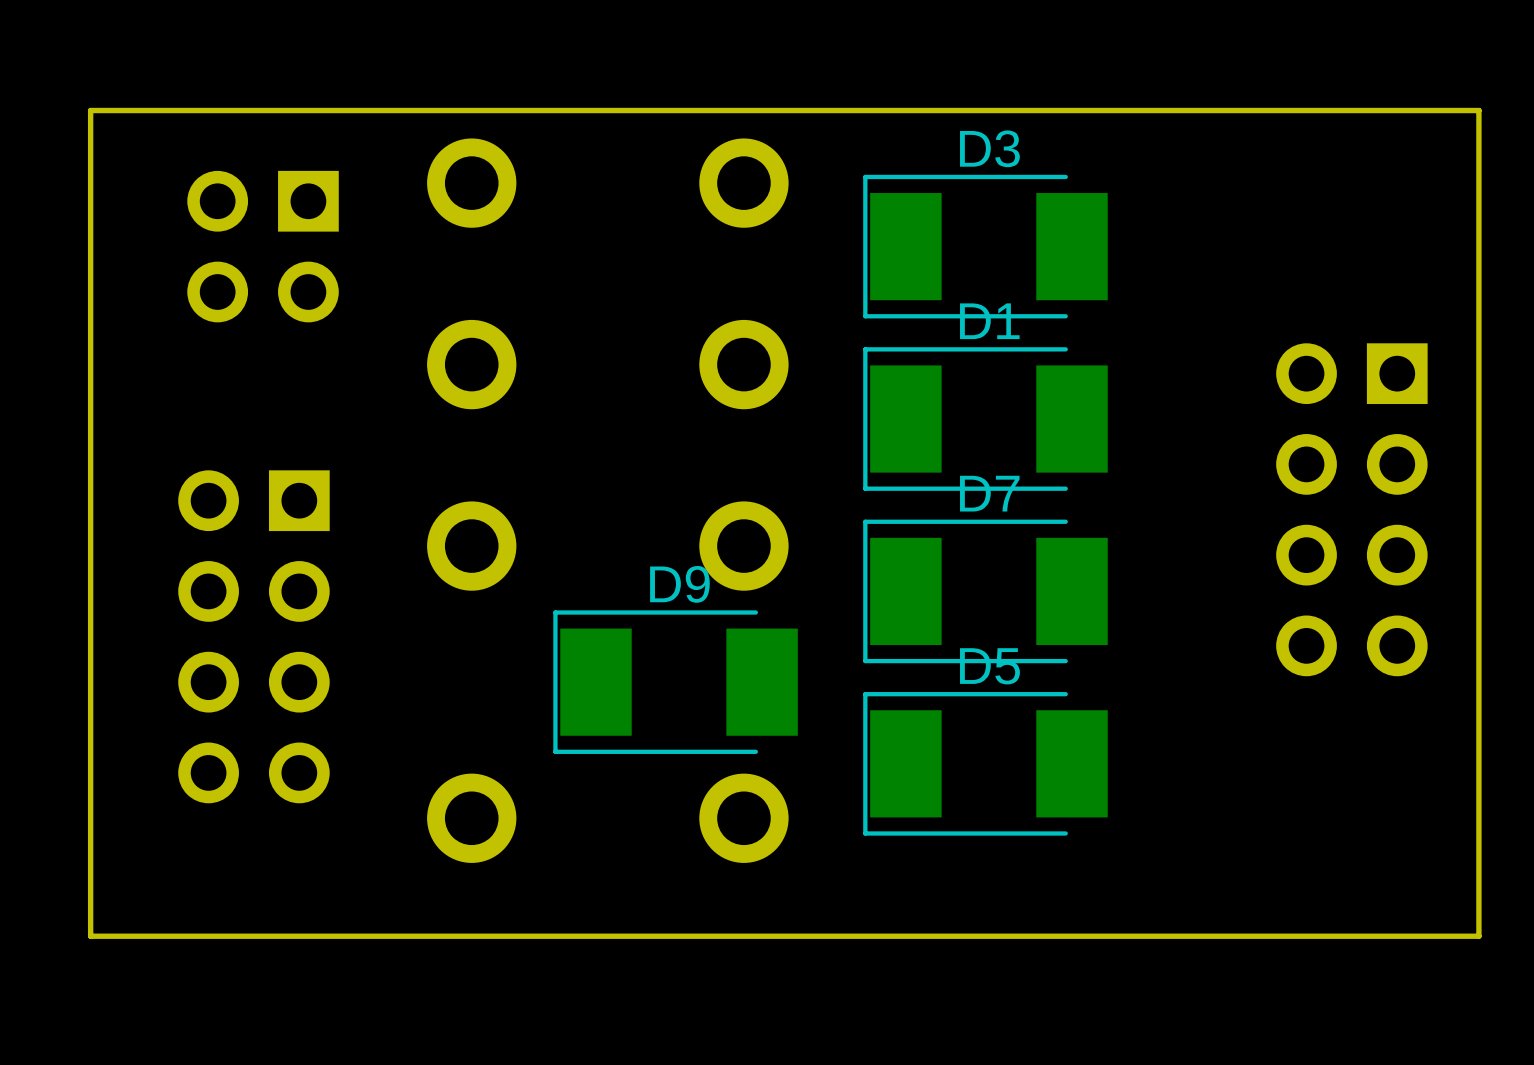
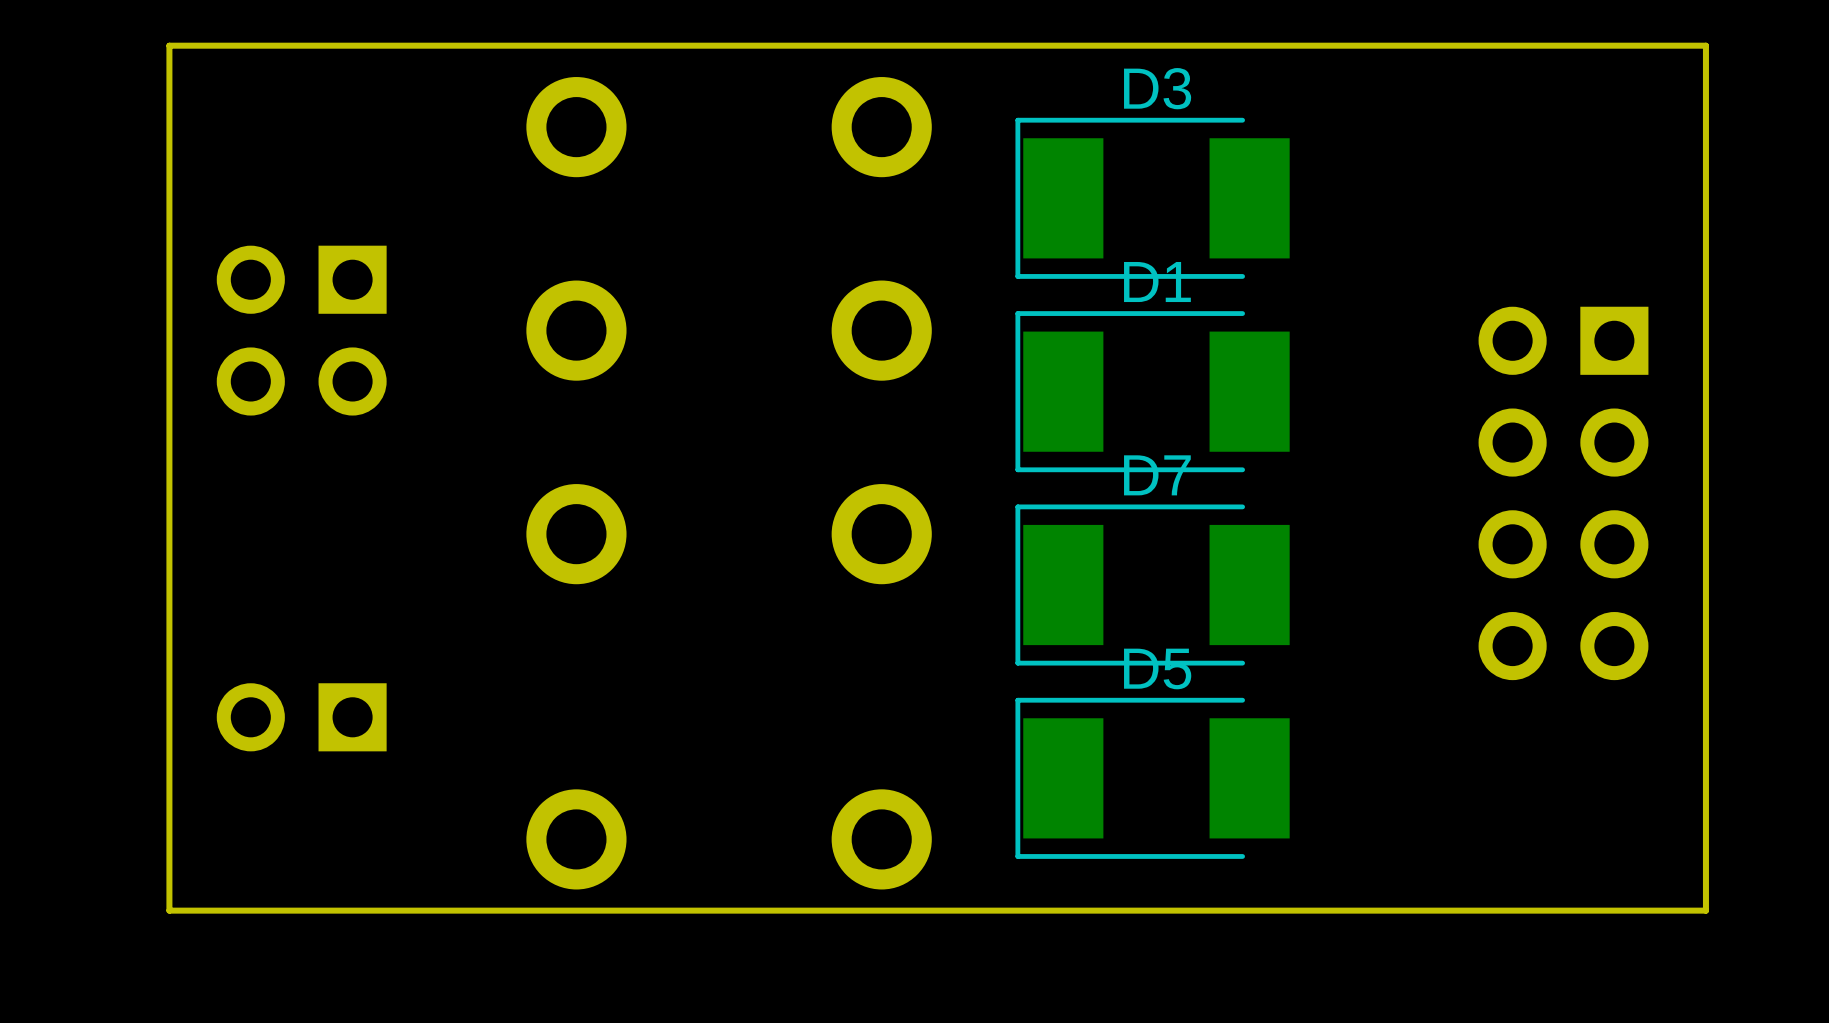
board edge: (108, 110) (90, 110) (90, 936) (1478, 936) (1478, 881) -> (169, 45) (169, 910) (1705, 910)
part position: (263, 246) -> (301, 330)
part: (253, 636) -> none
D9: (675, 682) -> none
part: none -> (301, 717)

